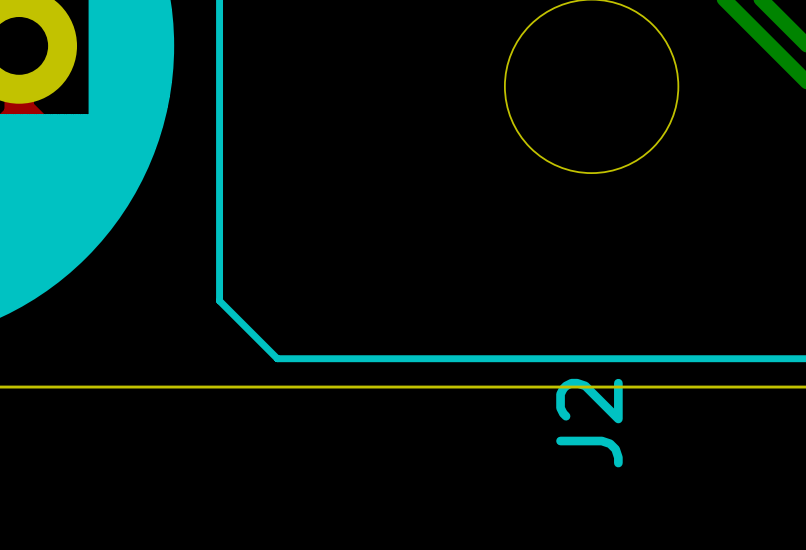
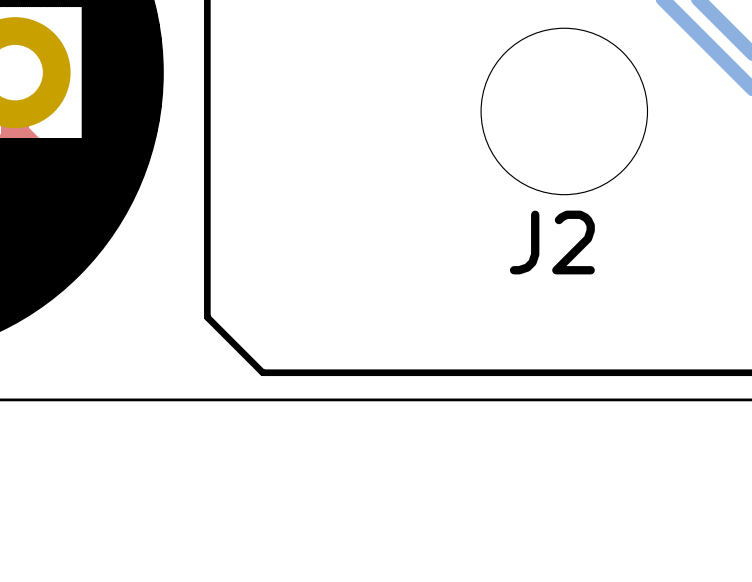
J2 name rotation: 0° (589, 423) -> 90° clockwise (552, 242)
J2 name position: J2 (589, 423) -> J2 (552, 242)

